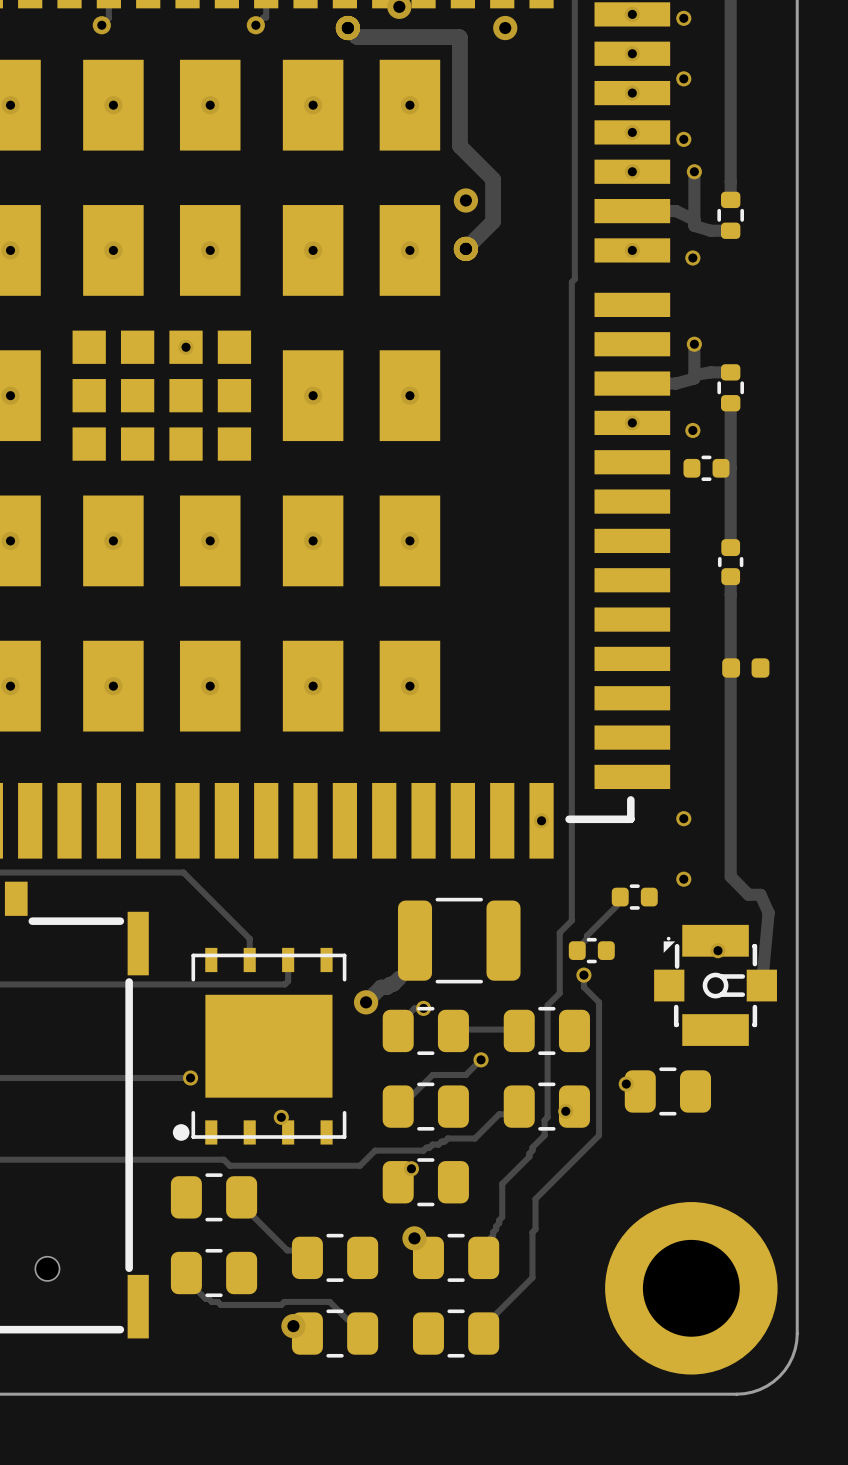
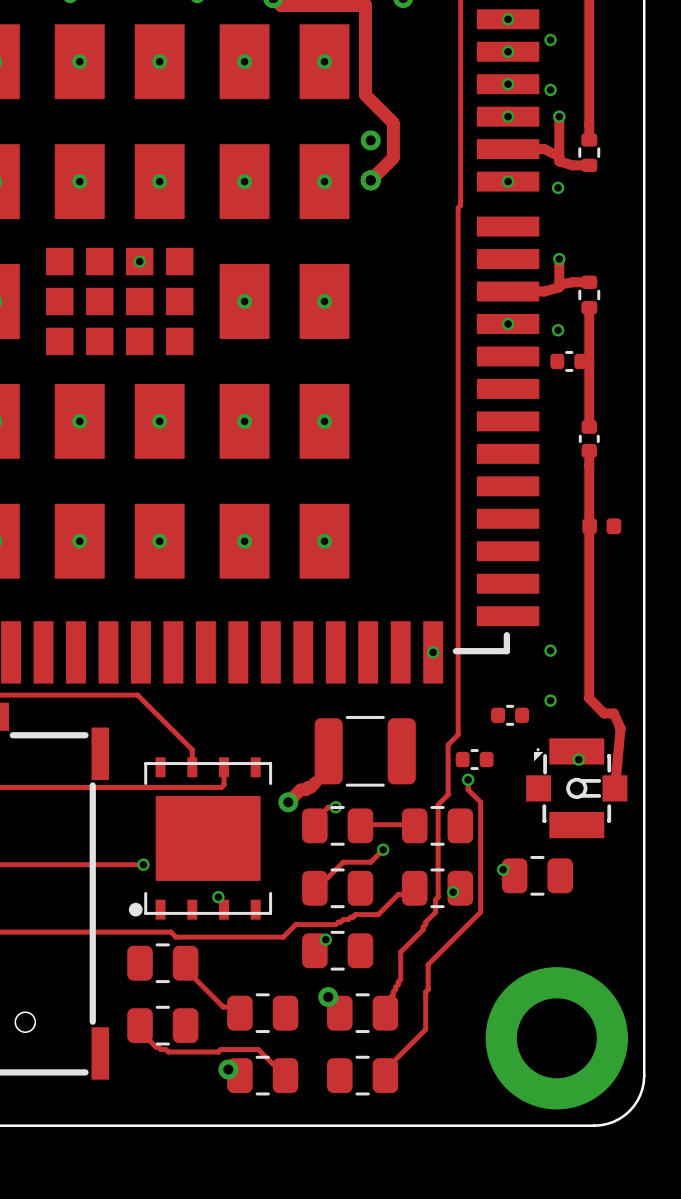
track: (617, 905) (586, 935) (583, 941) -> none

